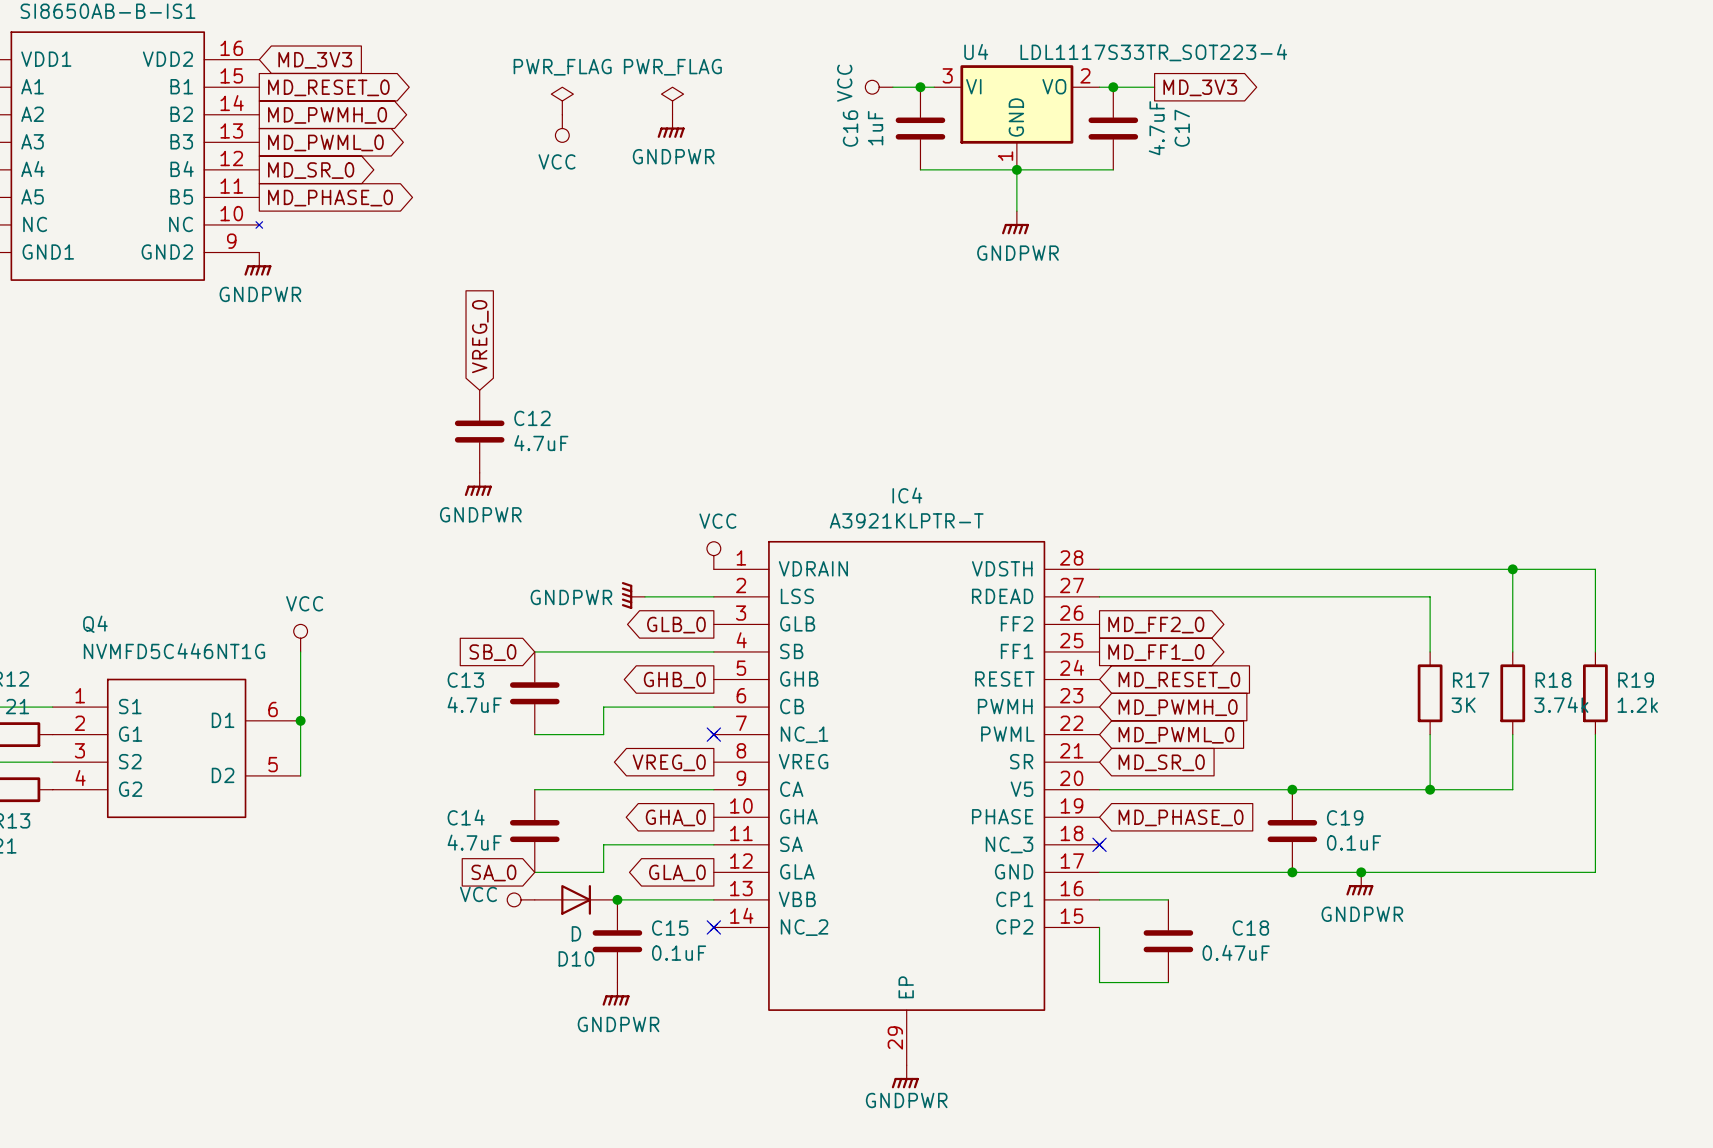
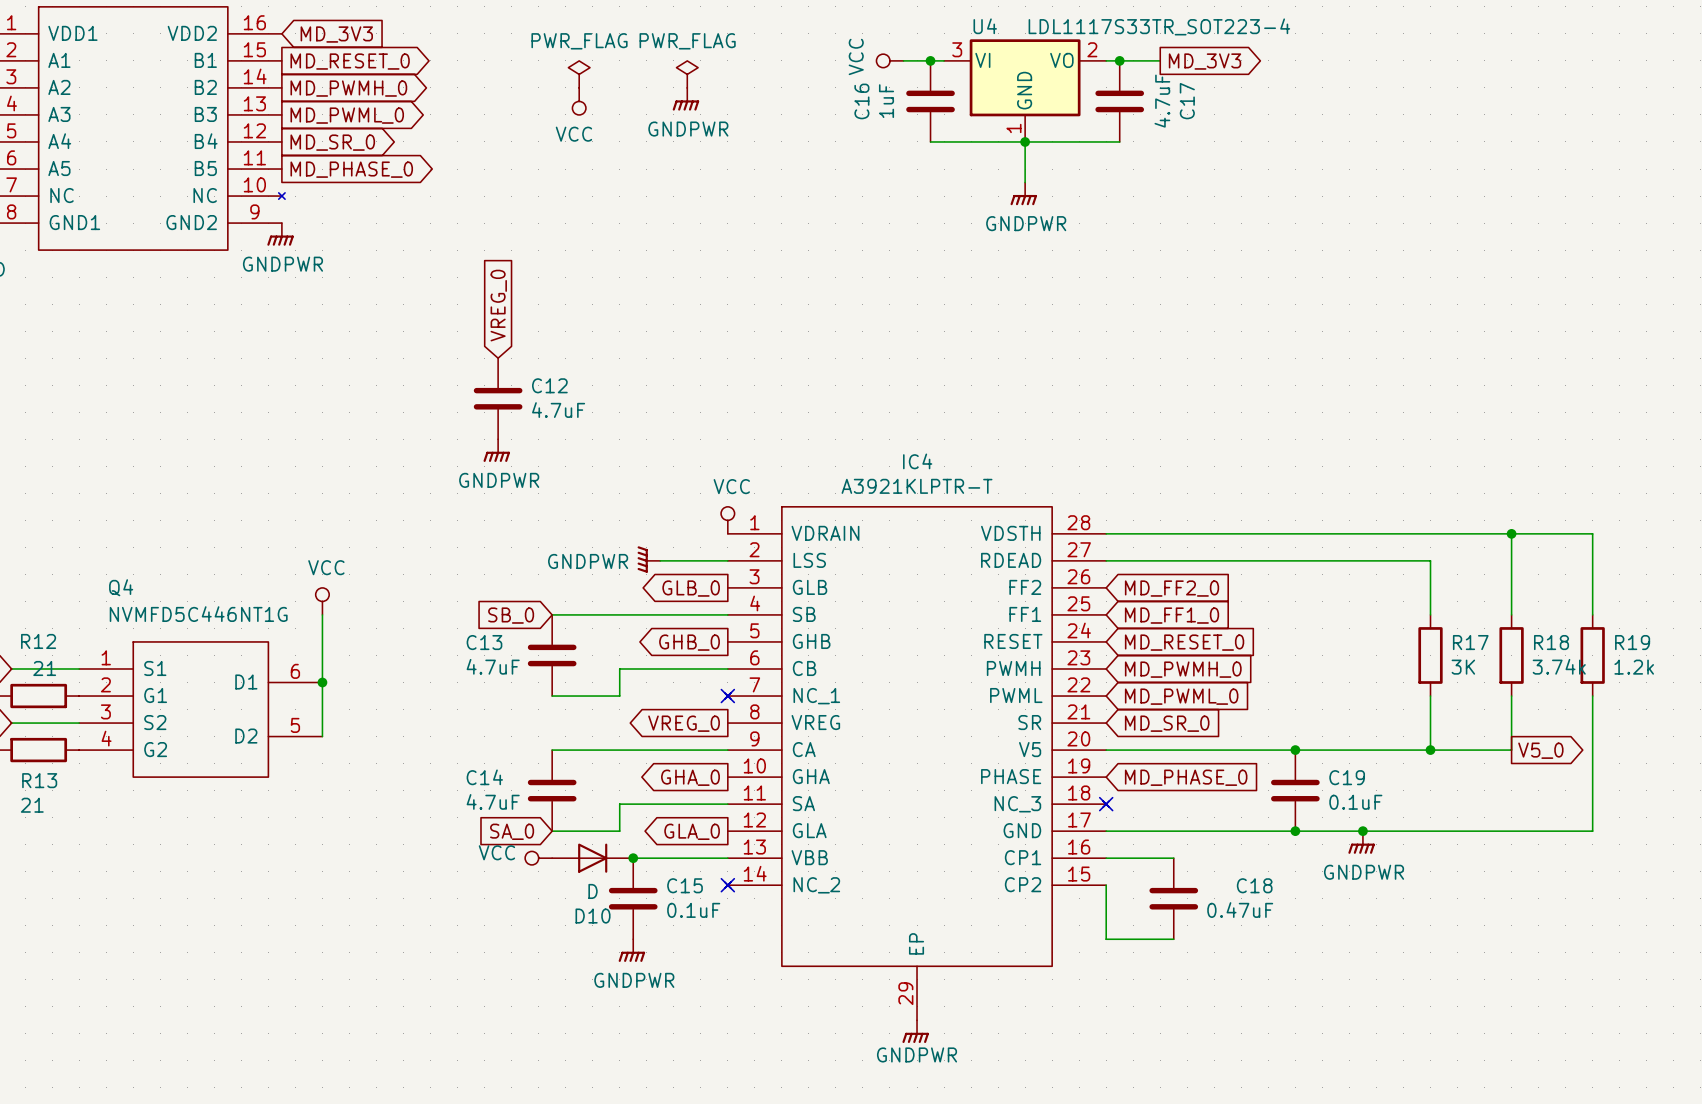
global label shape: output (1156, 625) -> input (1172, 588)
global label shape: output (1156, 652) -> input (1172, 615)
global label: none -> V5_0 (1540, 750)

